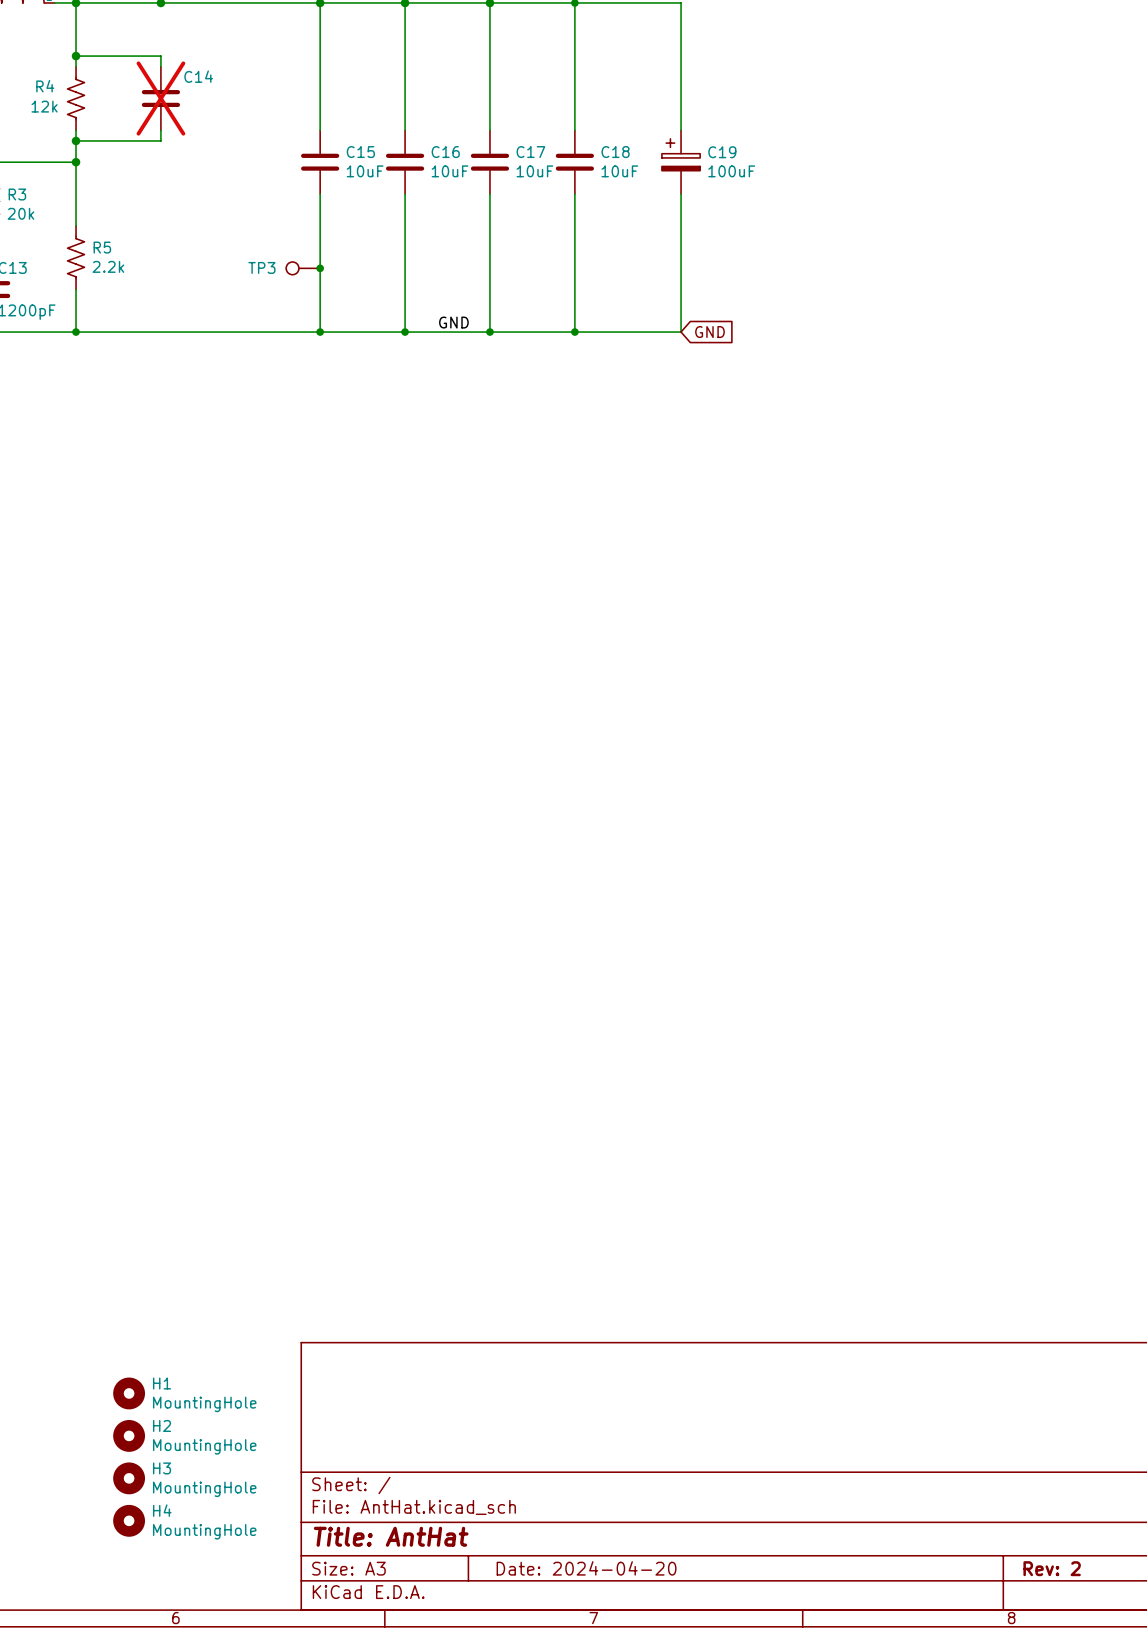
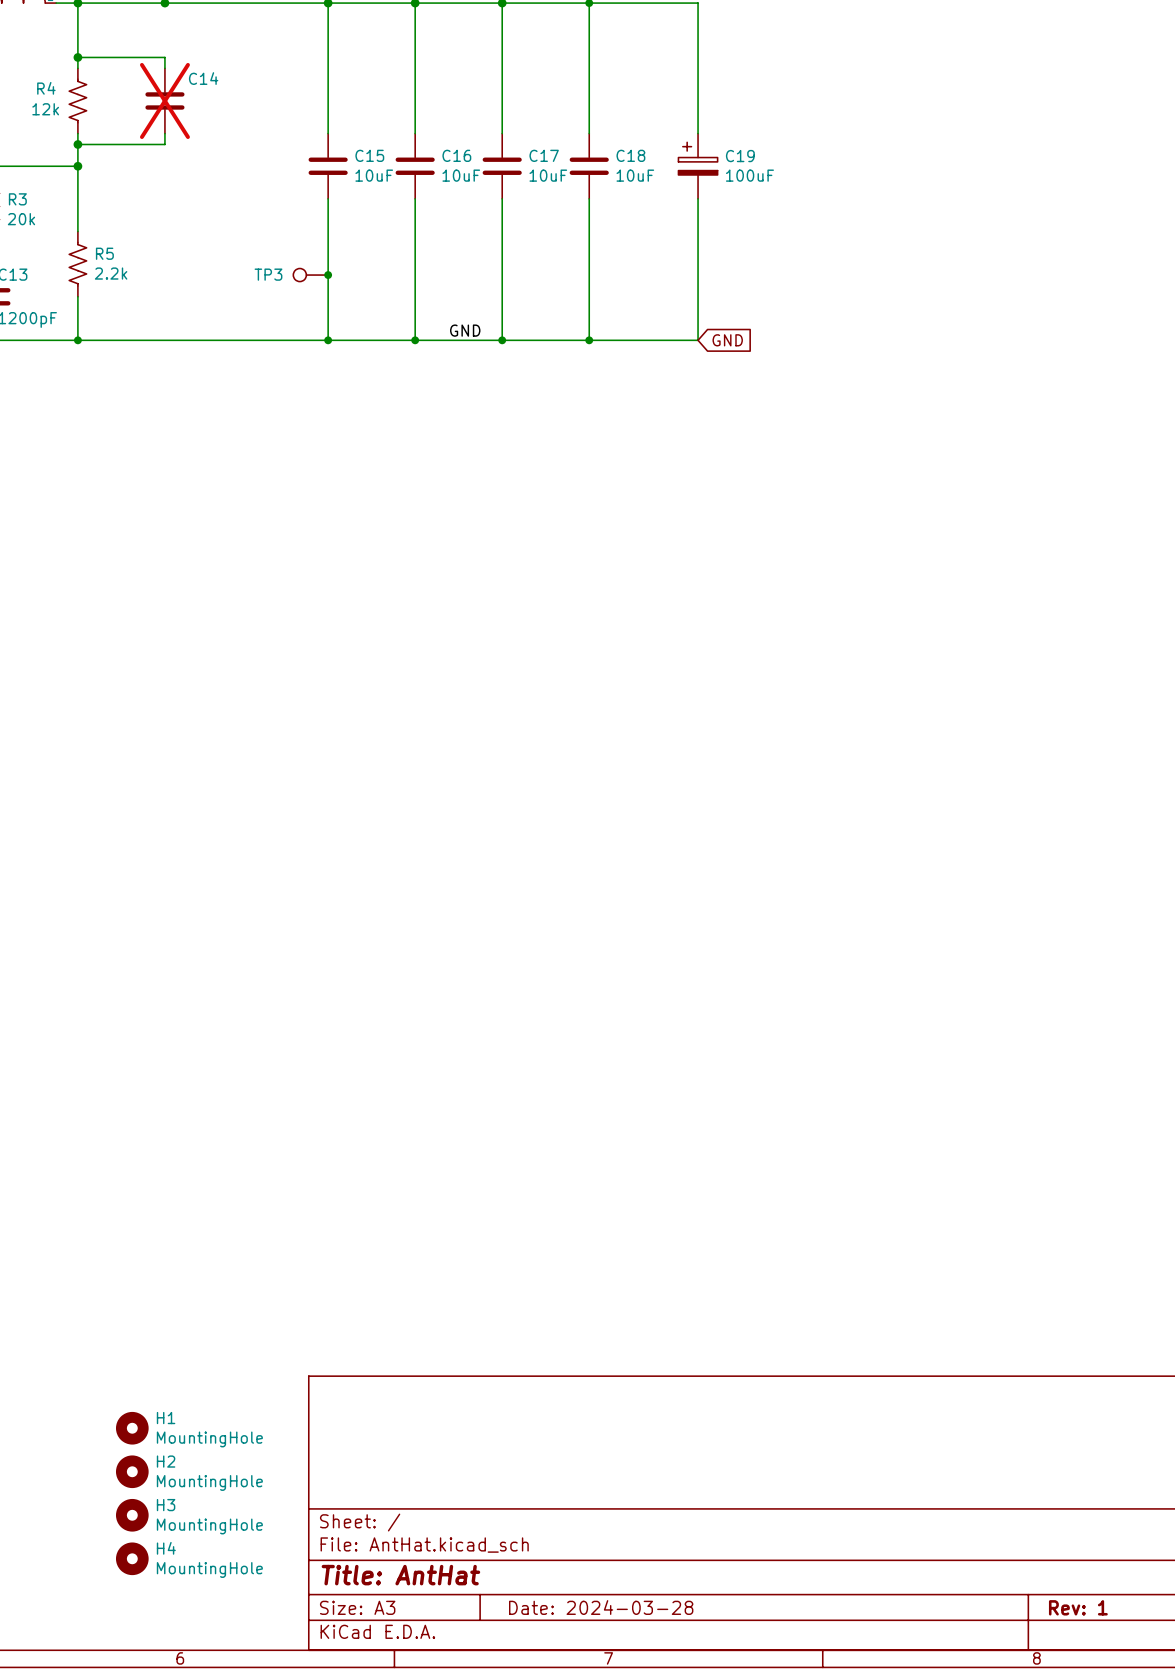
title block: Date: 2024-04-20 (586, 1568) -> Date: 2024-03-28 (601, 1607)
title block: Rev: 2 (1052, 1568) -> Rev: 1 (1078, 1607)

